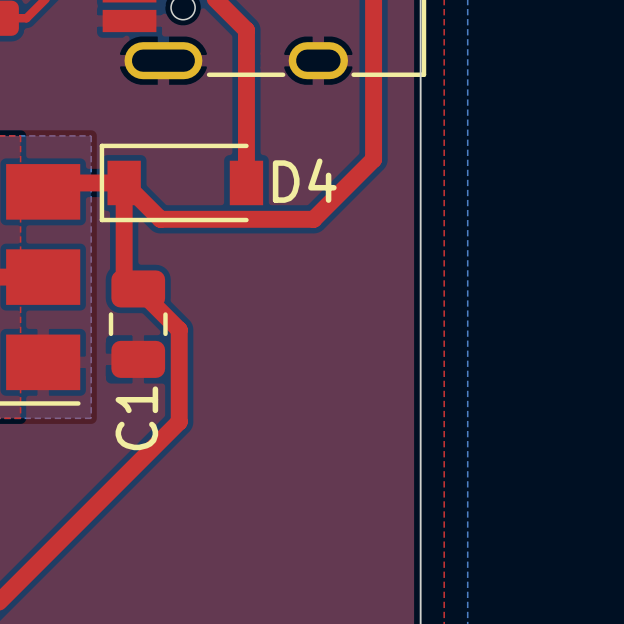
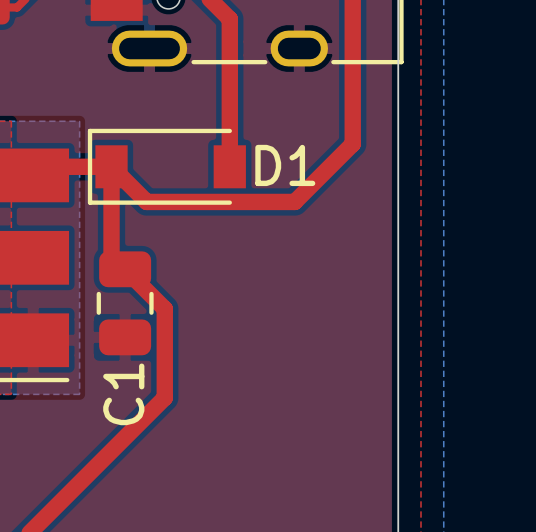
D4 name: D4 (304, 180) -> D1 (285, 165)

